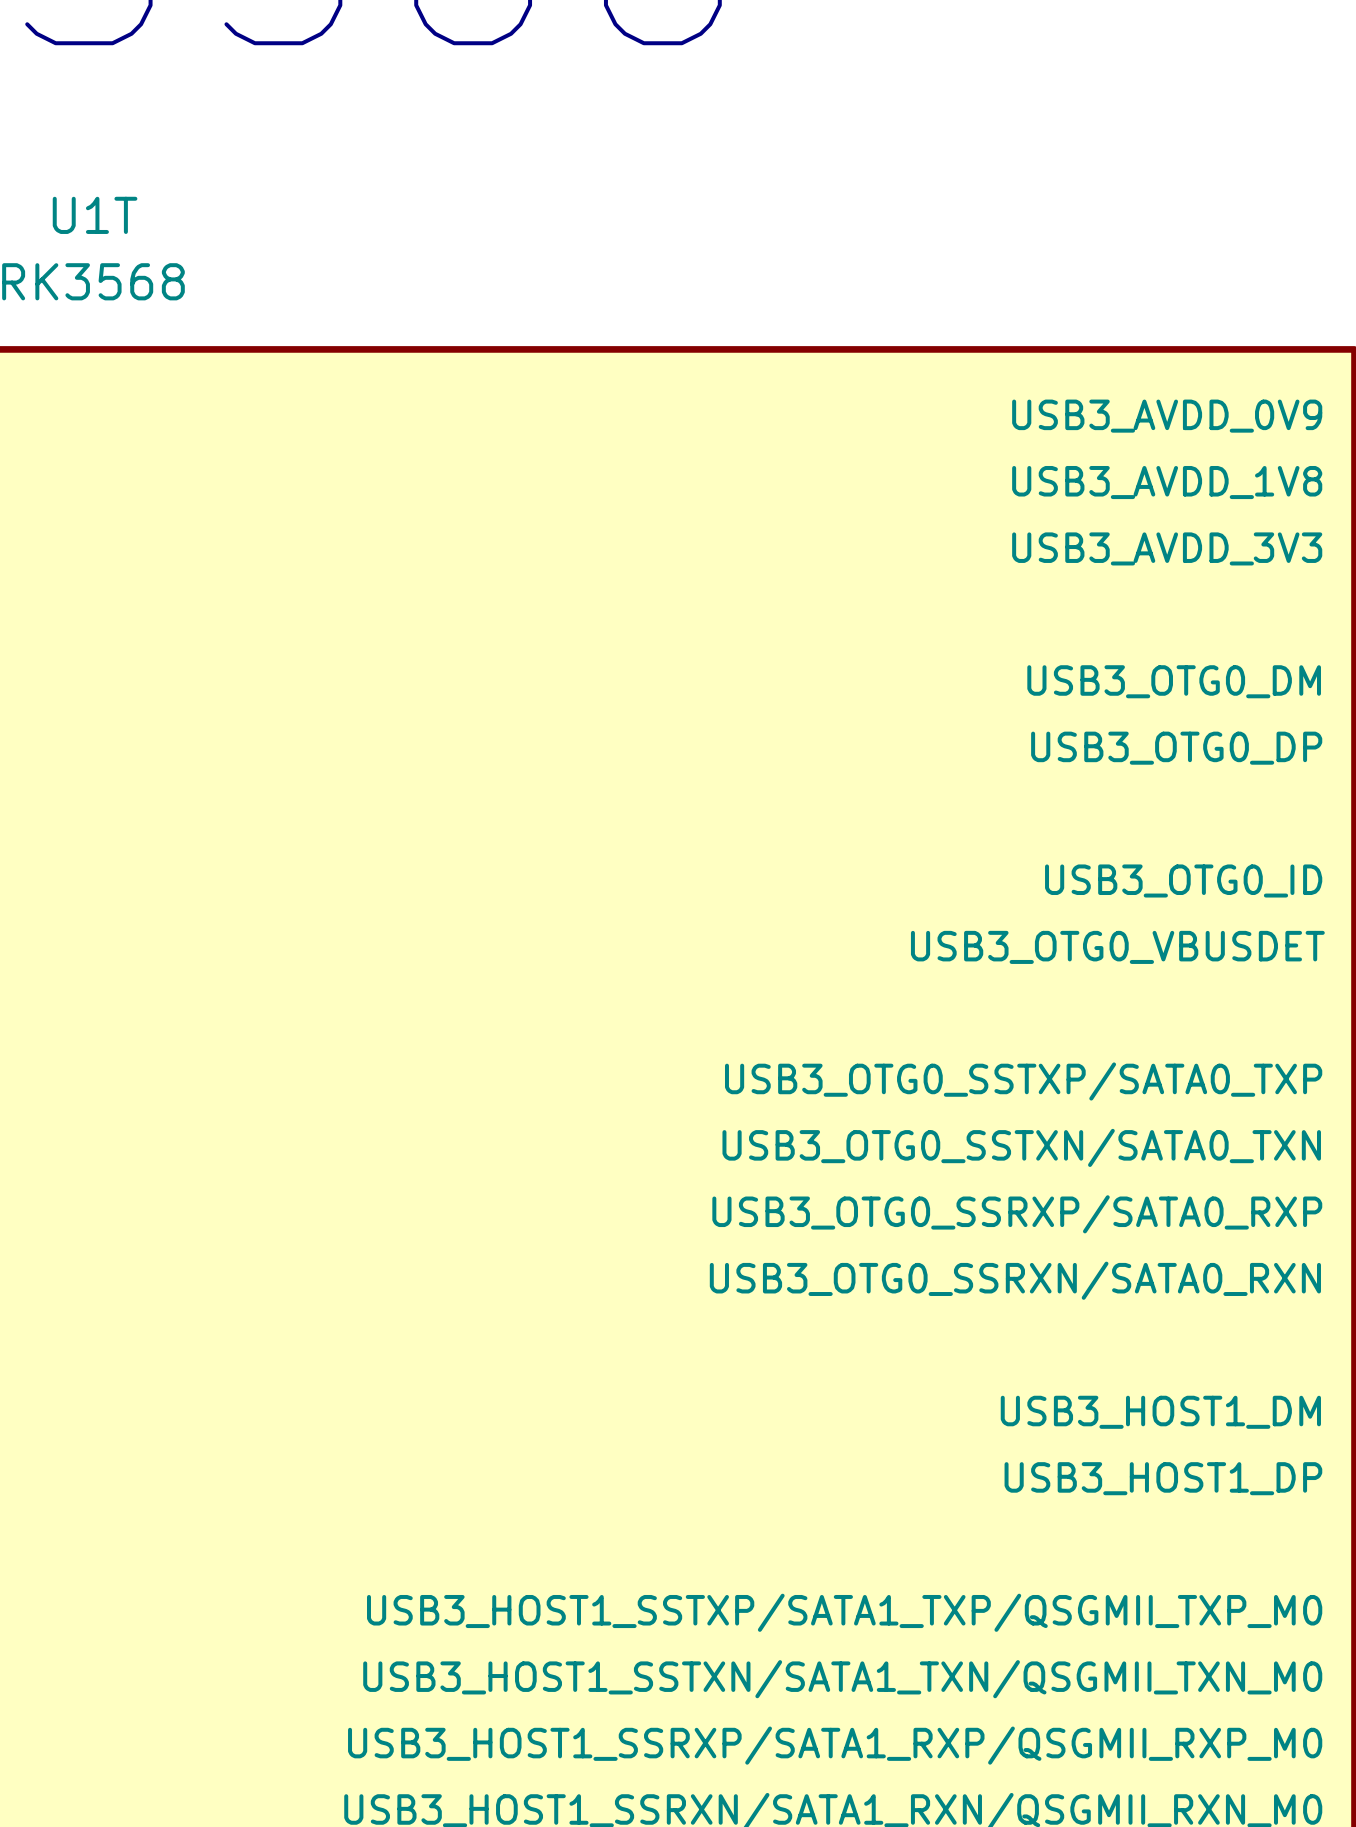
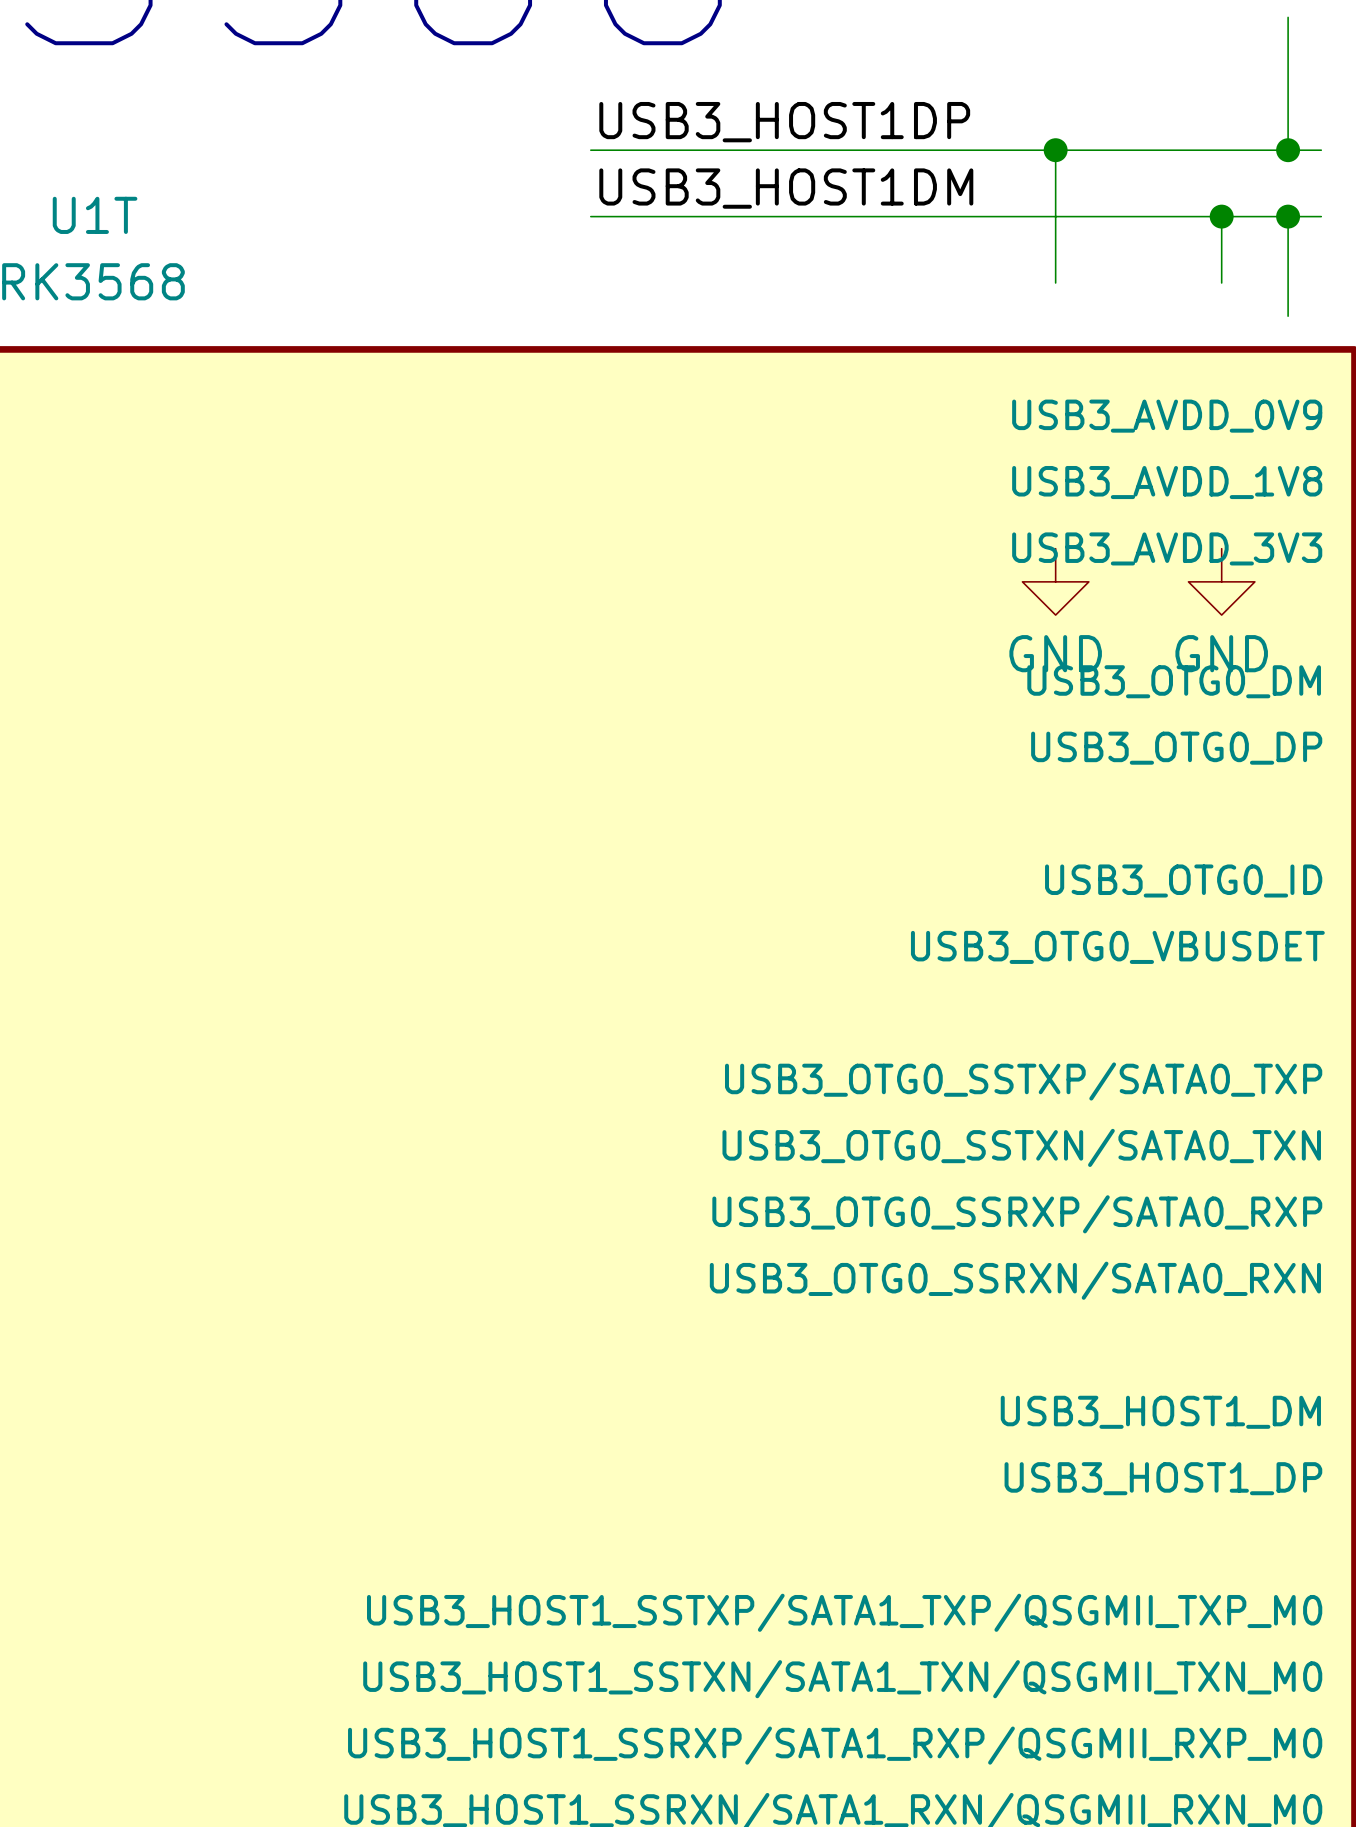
wire: none -> (1288, 17) (1288, 150)
label: none -> USB3_HOST1DP (784, 122)
wire: none -> (590, 150) (1321, 150)
wire: none -> (1055, 150) (1055, 283)
junction: none -> (1055, 150)
junction: none -> (1288, 150)
label: none -> USB3_HOST1DM (786, 188)
wire: none -> (590, 216) (1321, 216)
wire: none -> (1221, 216) (1221, 283)
junction: none -> (1221, 216)
wire: none -> (1288, 216) (1288, 316)
junction: none -> (1288, 216)
power symbol: none -> GND (1055, 581)
power symbol: none -> GND (1221, 581)

